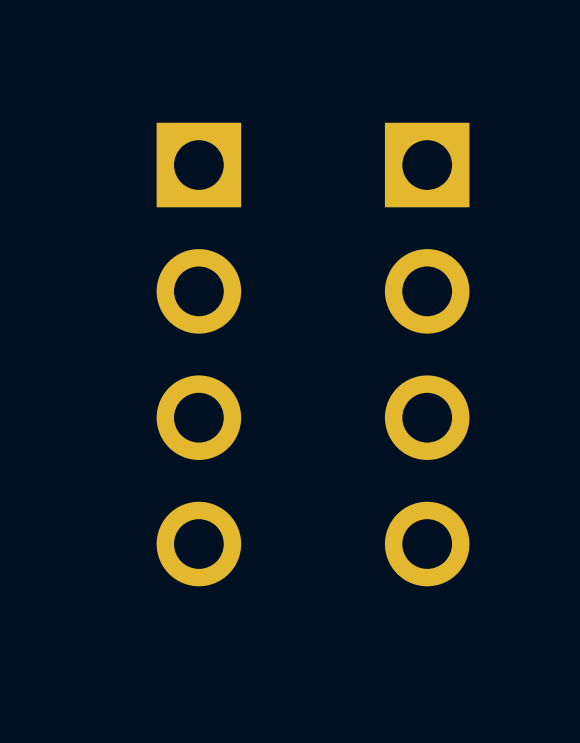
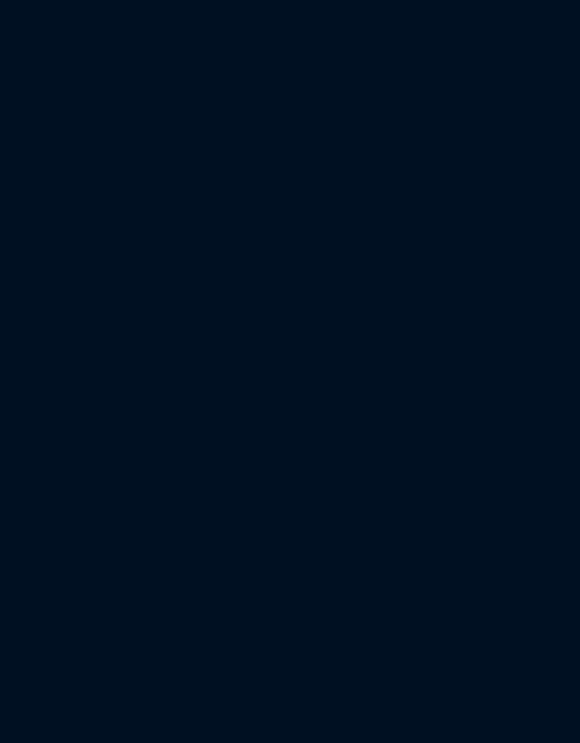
part: (198, 354) -> none
part: (427, 354) -> none

